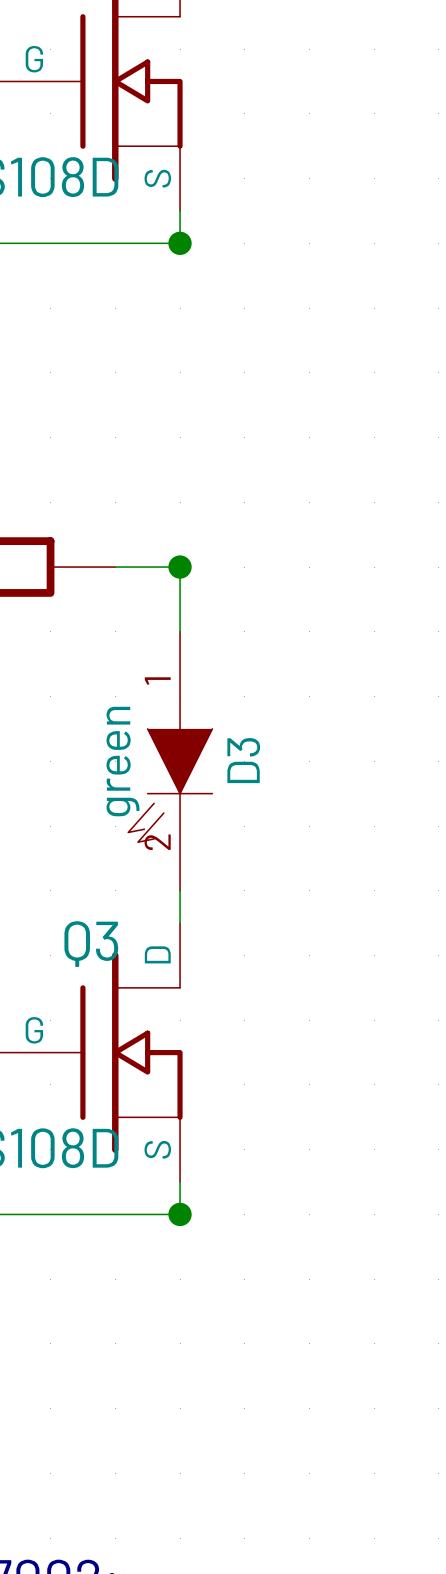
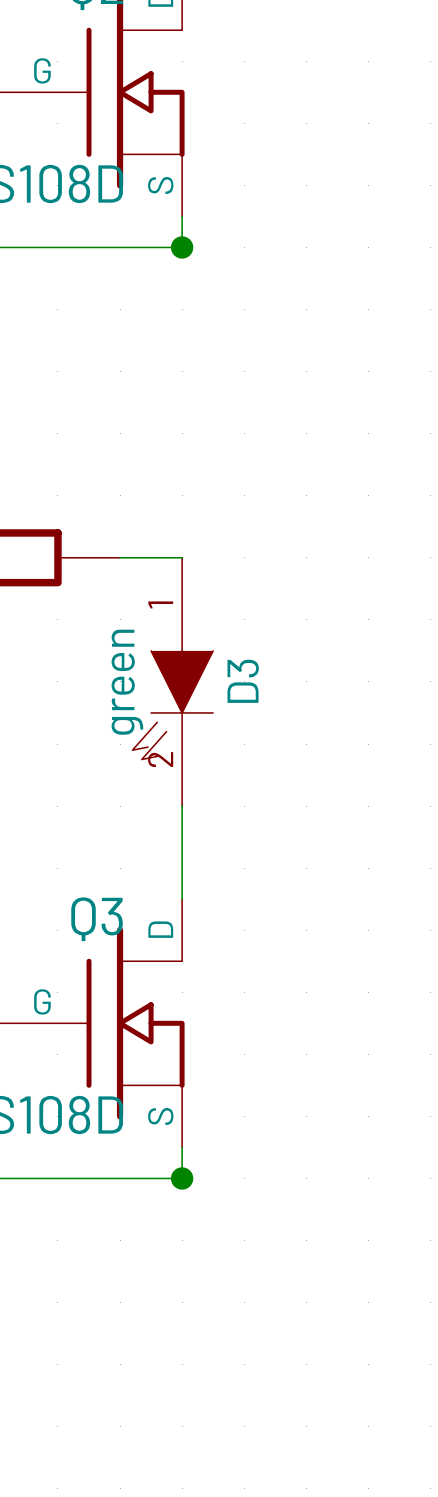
junction: (180, 567) -> none
D3 position: (170, 761) -> (172, 681)

